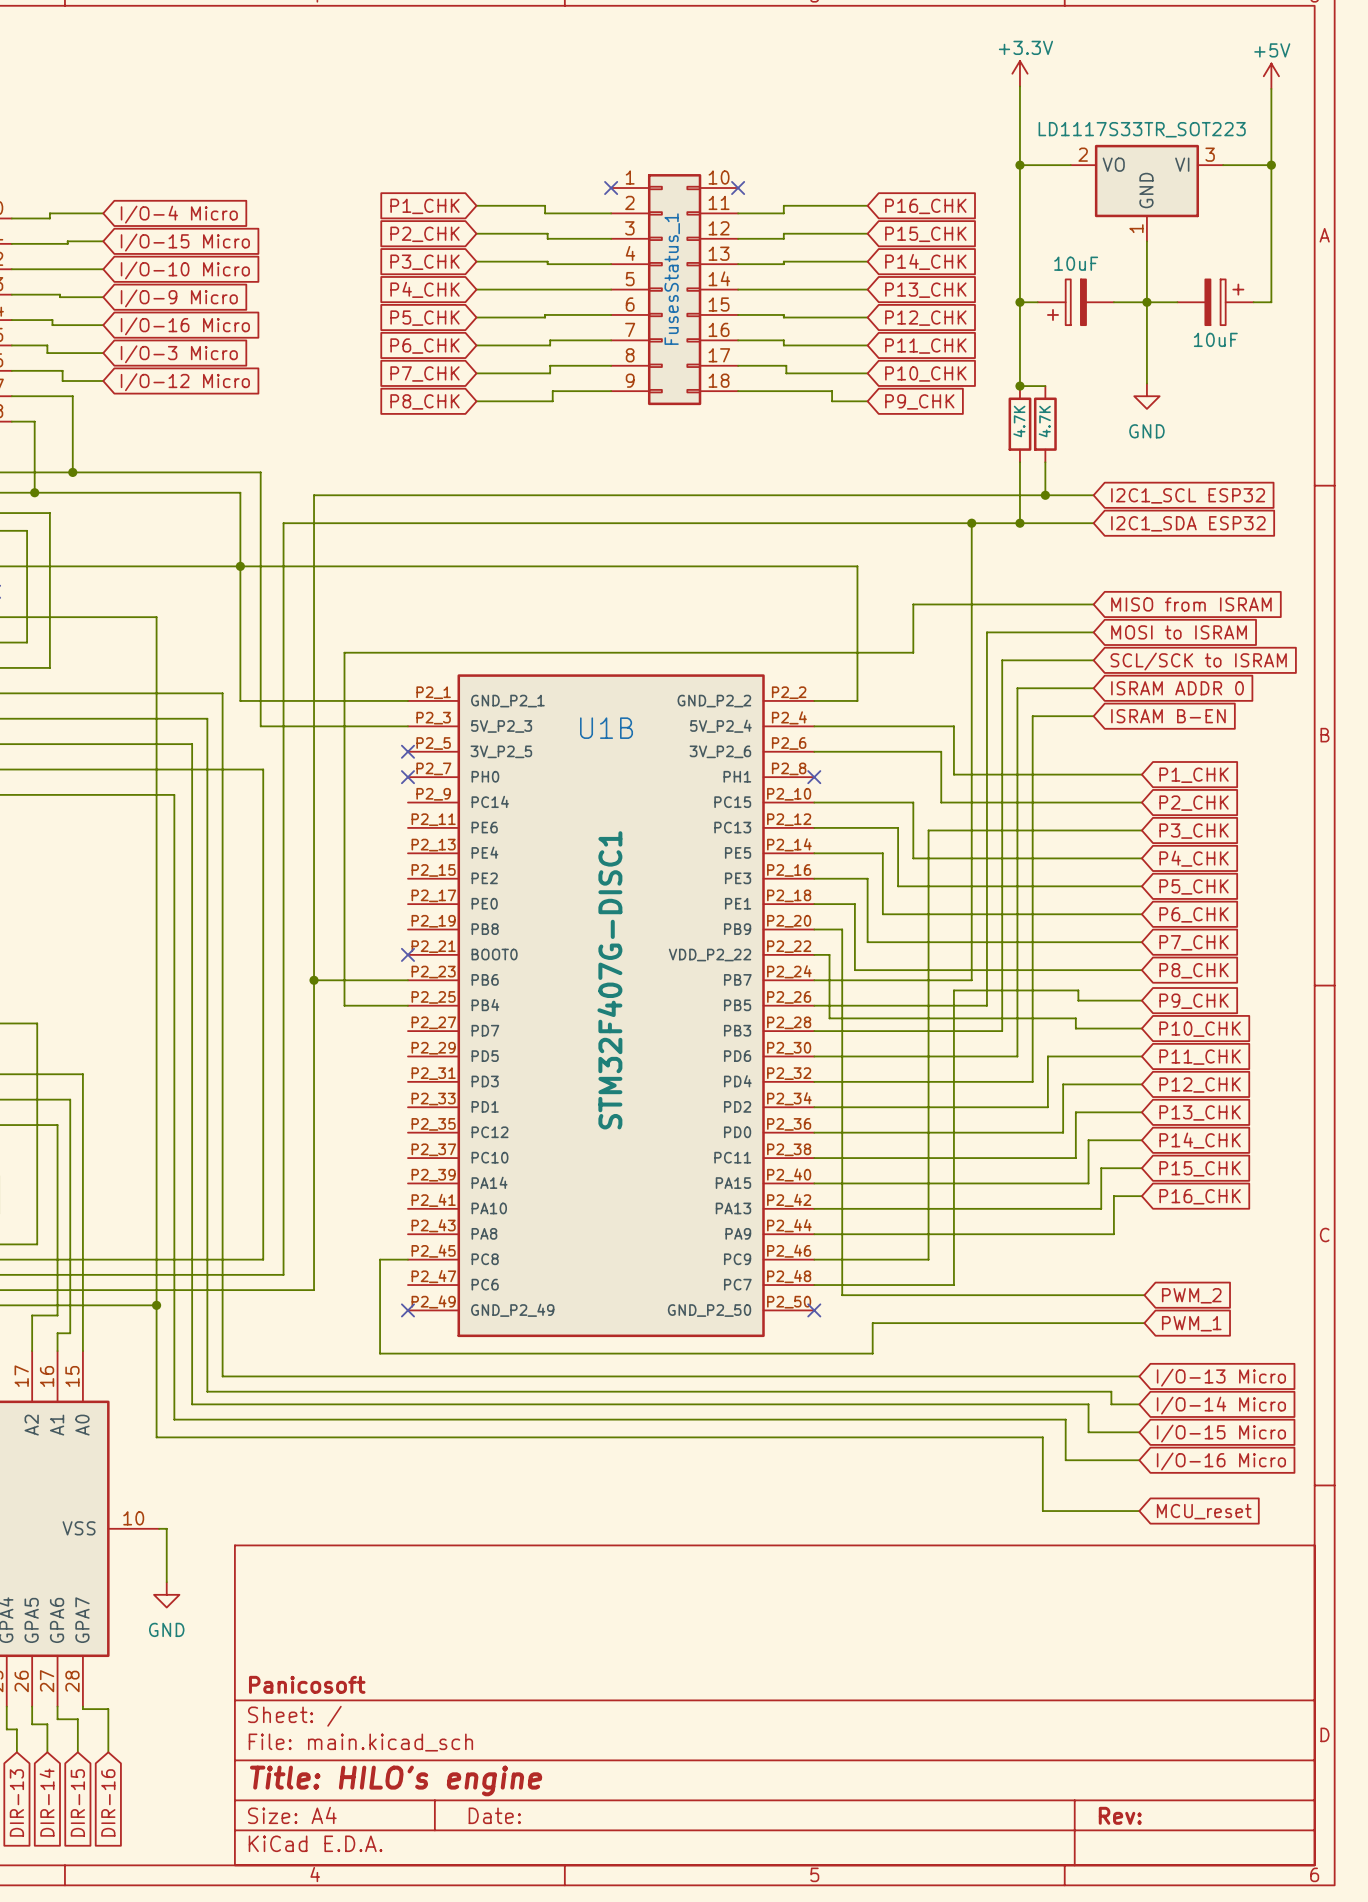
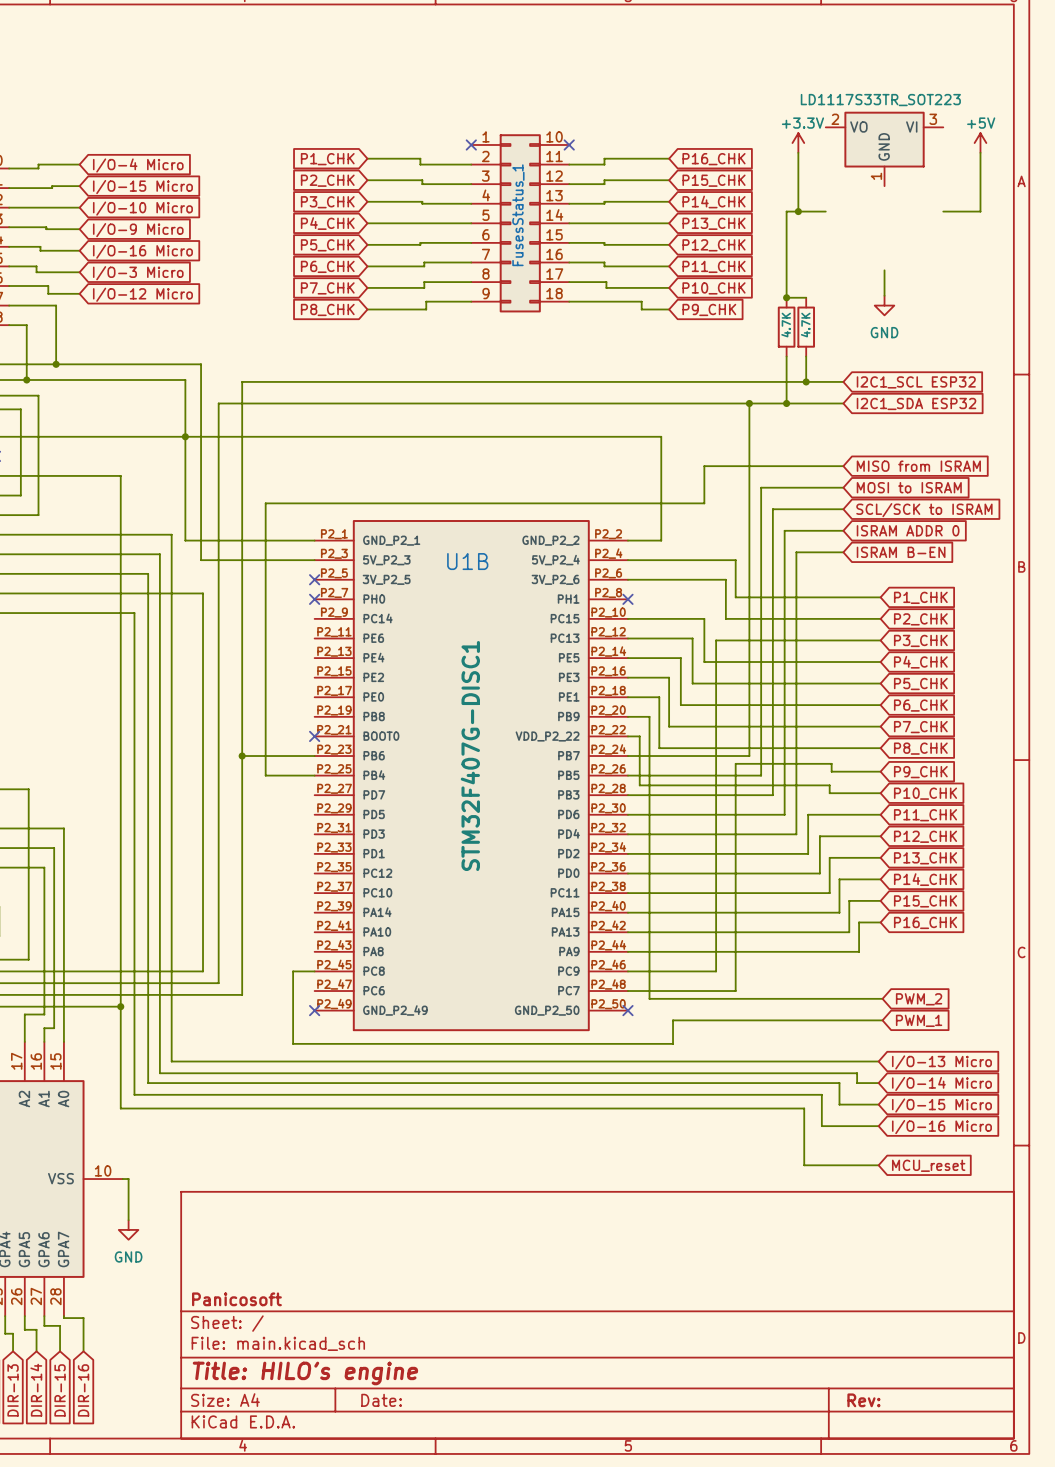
power symbol position: +3.3V (1019, 73) -> +3.3V (798, 143)
power symbol position: +5V (1271, 76) -> +5V (980, 143)
wire: (1019, 86) (1019, 274) -> (825, 211) (786, 211)
wire: (1271, 88) (1271, 198) -> none
wire: (1019, 165) (1070, 165) -> none
junction: (1019, 165) -> none
wire: (1223, 165) (1271, 165) -> none
junction: (1271, 165) -> none
wire: none -> (798, 152) (798, 211)
wire: (1146, 241) (1146, 350) -> none
wire: (1271, 274) (1271, 302) (1253, 302) -> (980, 211) (943, 211)
wire: (1019, 302) (1037, 302) -> none
junction position: (1019, 302) -> (798, 211)
part: 10uF (1075, 302) -> none
wire: (1113, 302) (1177, 302) -> none
junction: (1146, 302) -> none
part: 10uF (1215, 302) -> none

